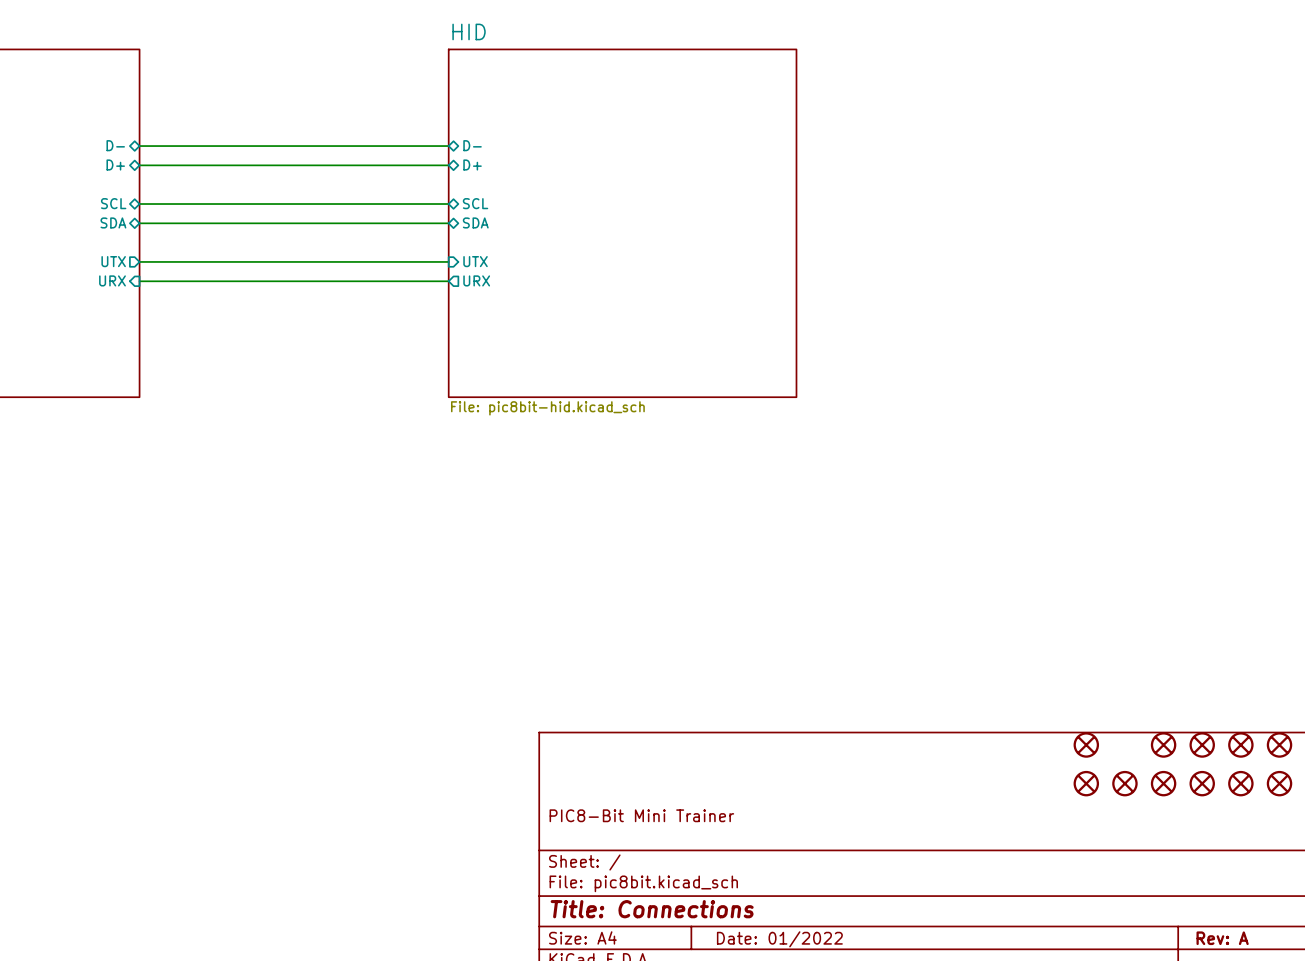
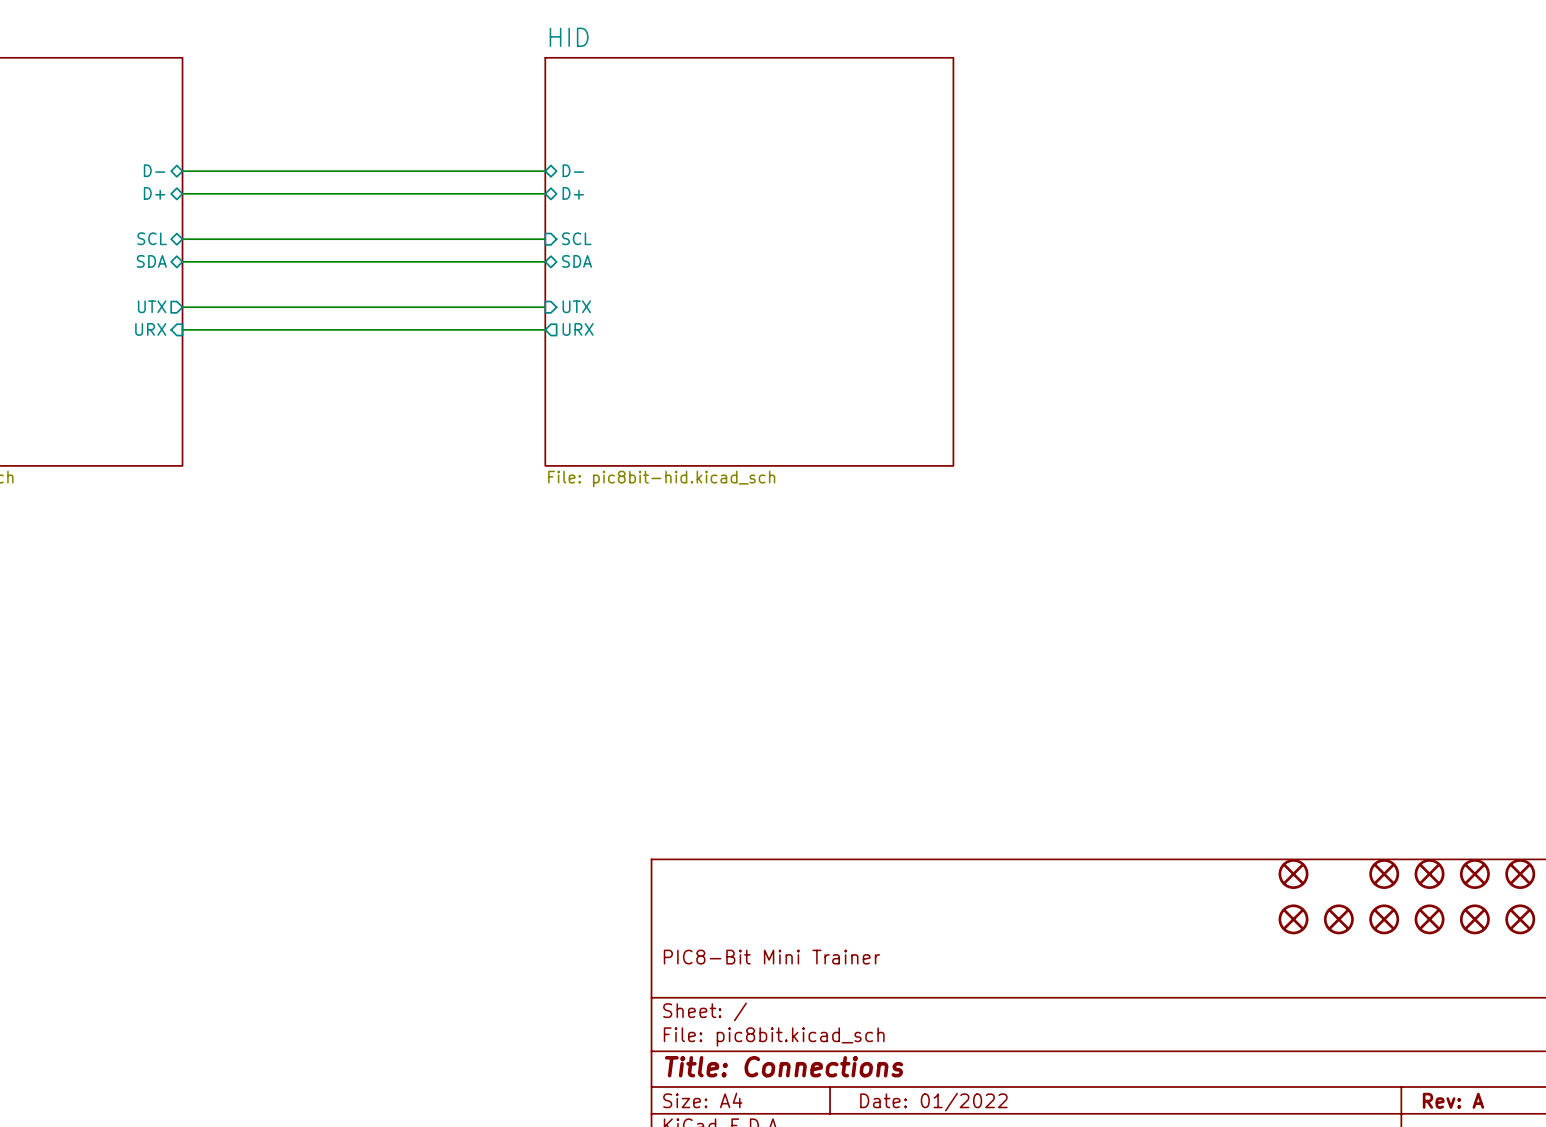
sheet pin shape: bidirectional (475, 203) -> input (576, 238)

